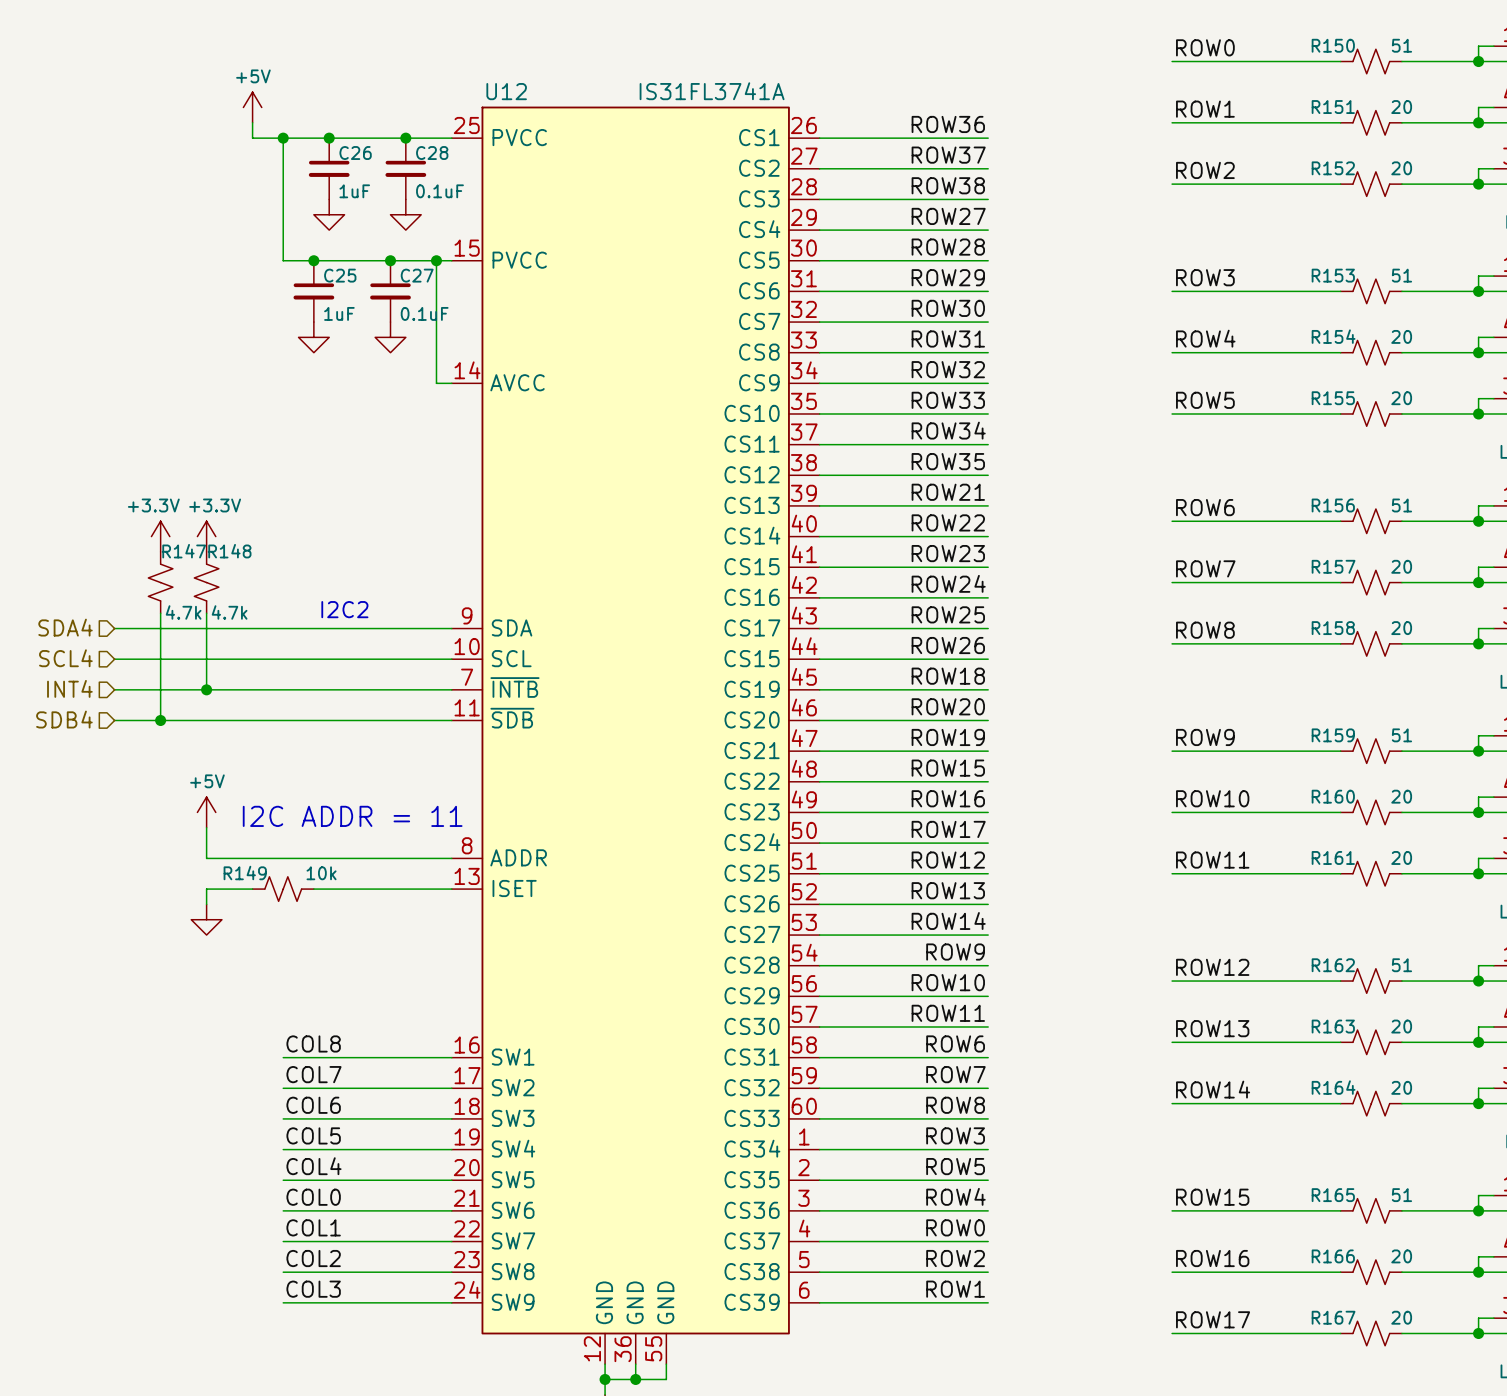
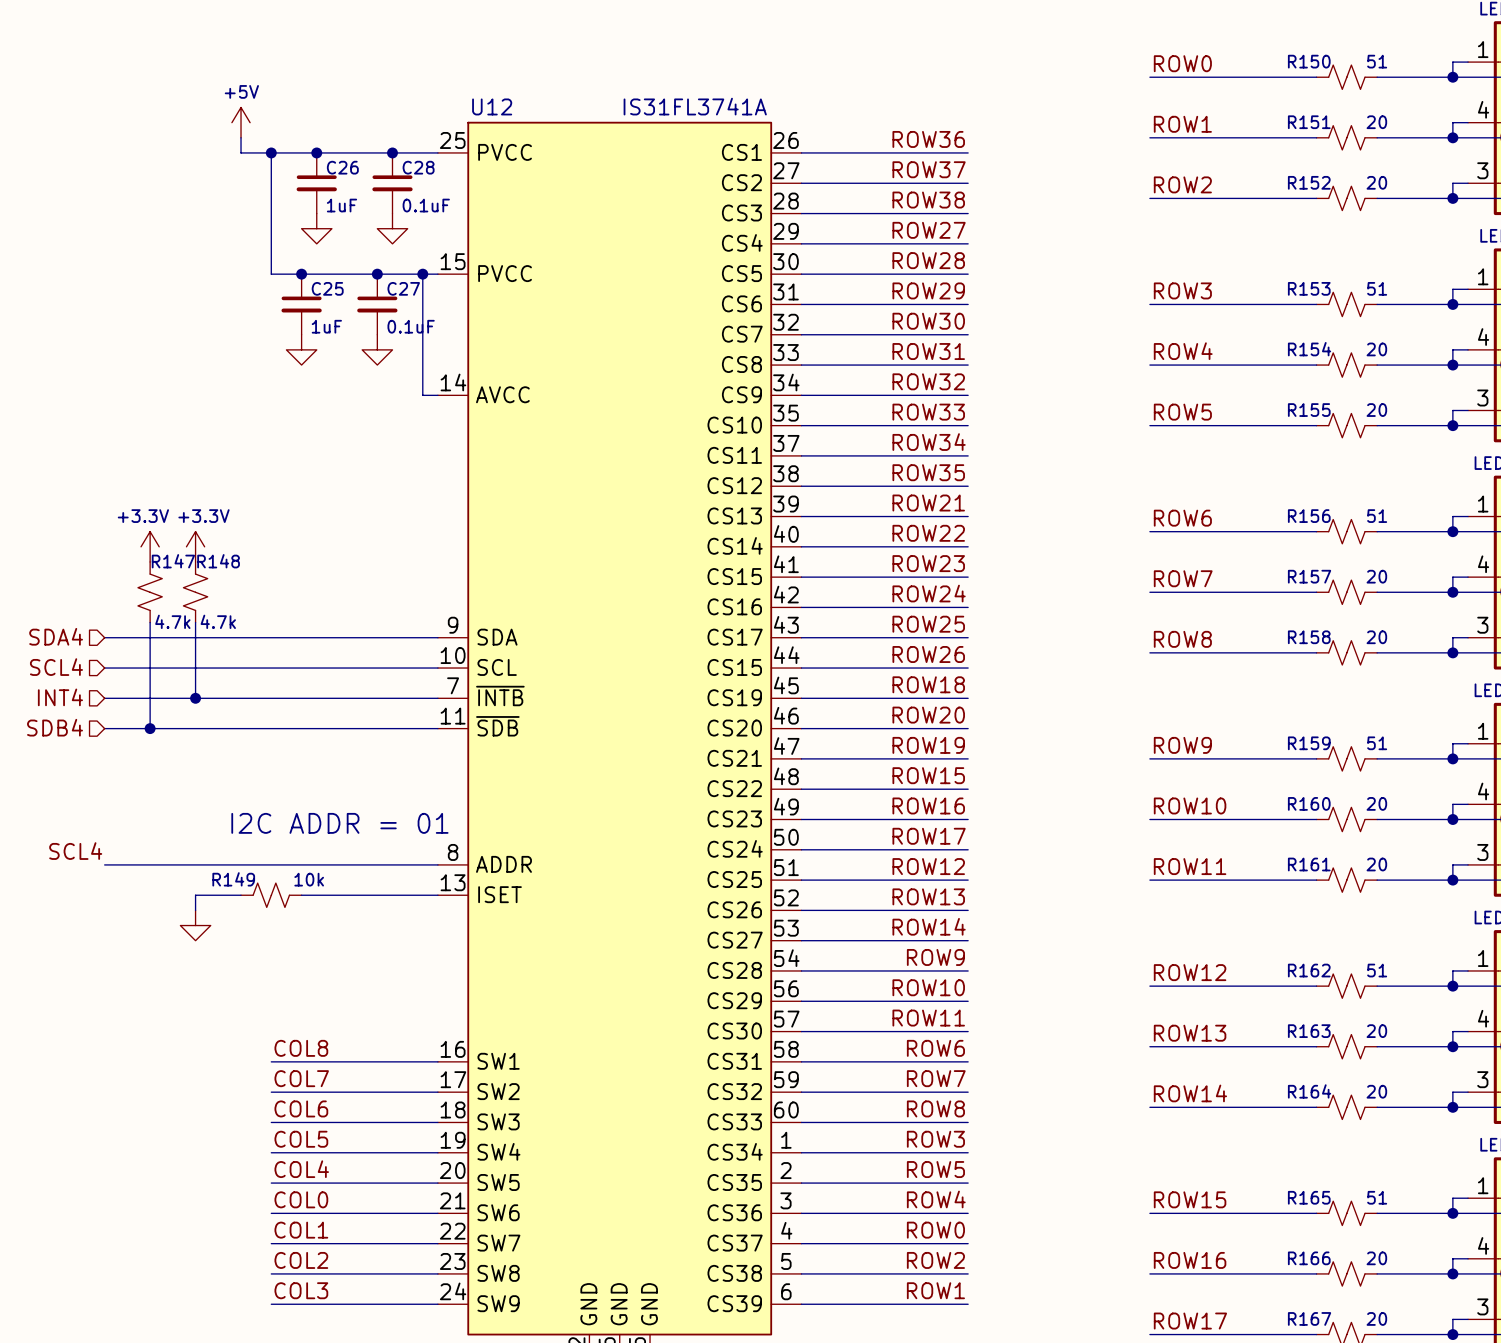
text: I2C2 (344, 609) -> none
power symbol: +5V (206, 812) -> none
text: I2C ADDR = 11 (352, 816) -> I2C ADDR = 01 (339, 823)
wire: (206, 827) (206, 858) -> (104, 864) (195, 864)
label: none -> SCL4 (75, 851)

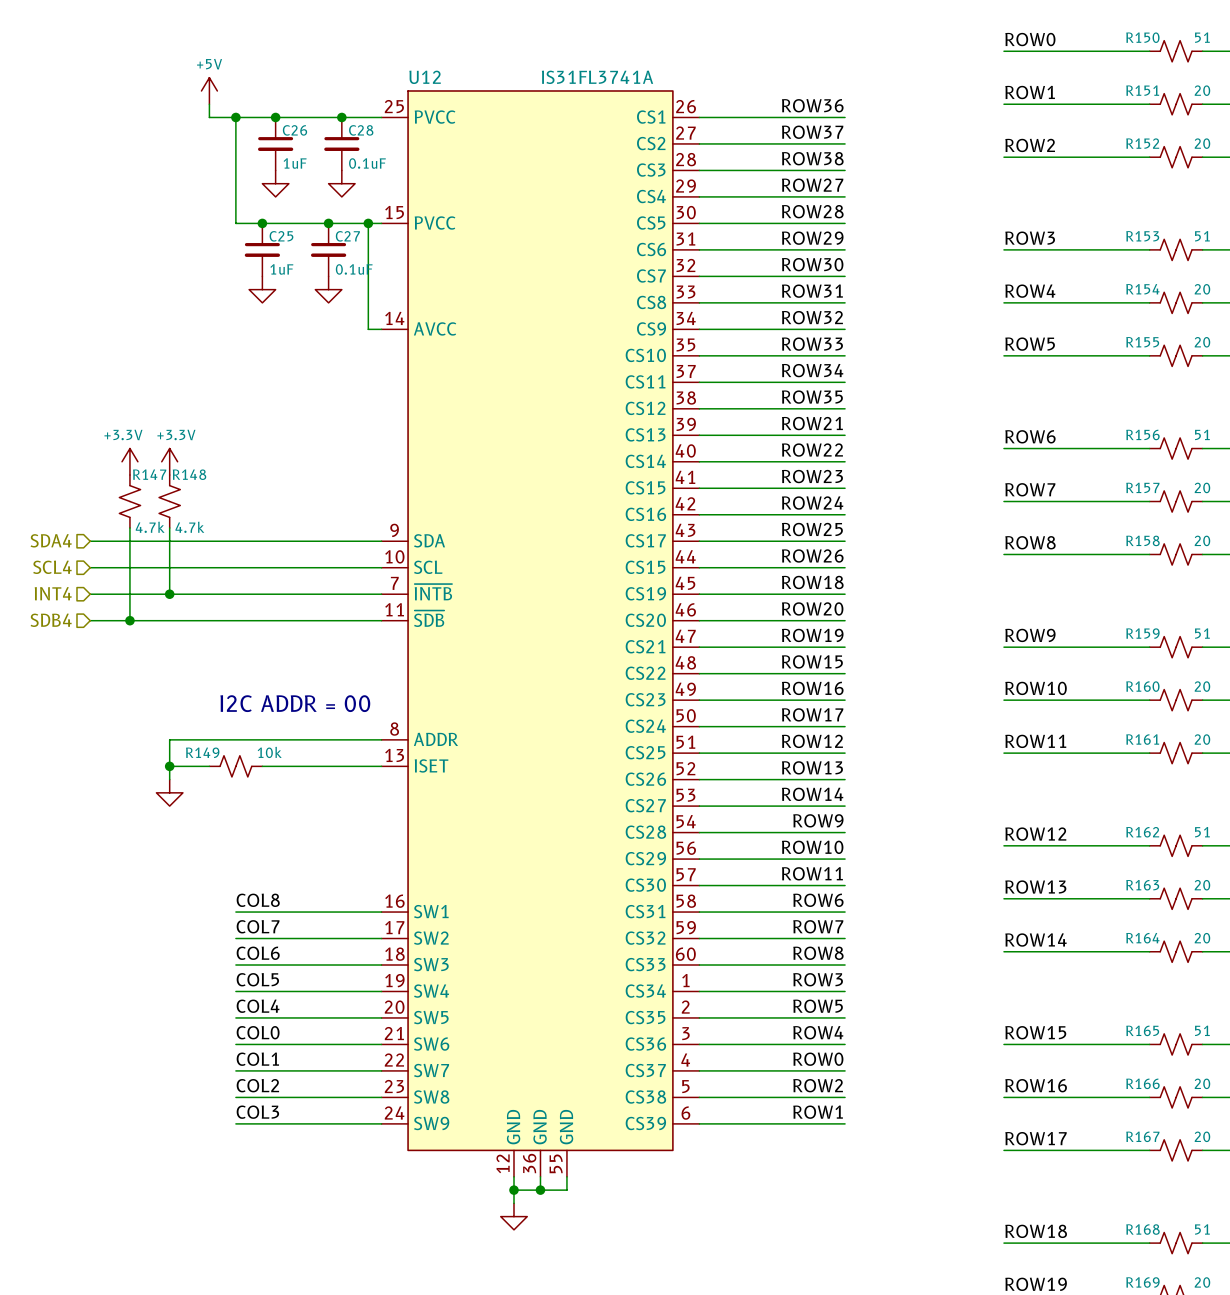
text: I2C ADDR = 01 (339, 823) -> I2C ADDR = 00 (295, 703)
label: SCL4 (75, 851) -> none
wire: (104, 864) (195, 864) -> (169, 766) (169, 739)
junction: none -> (169, 766)

